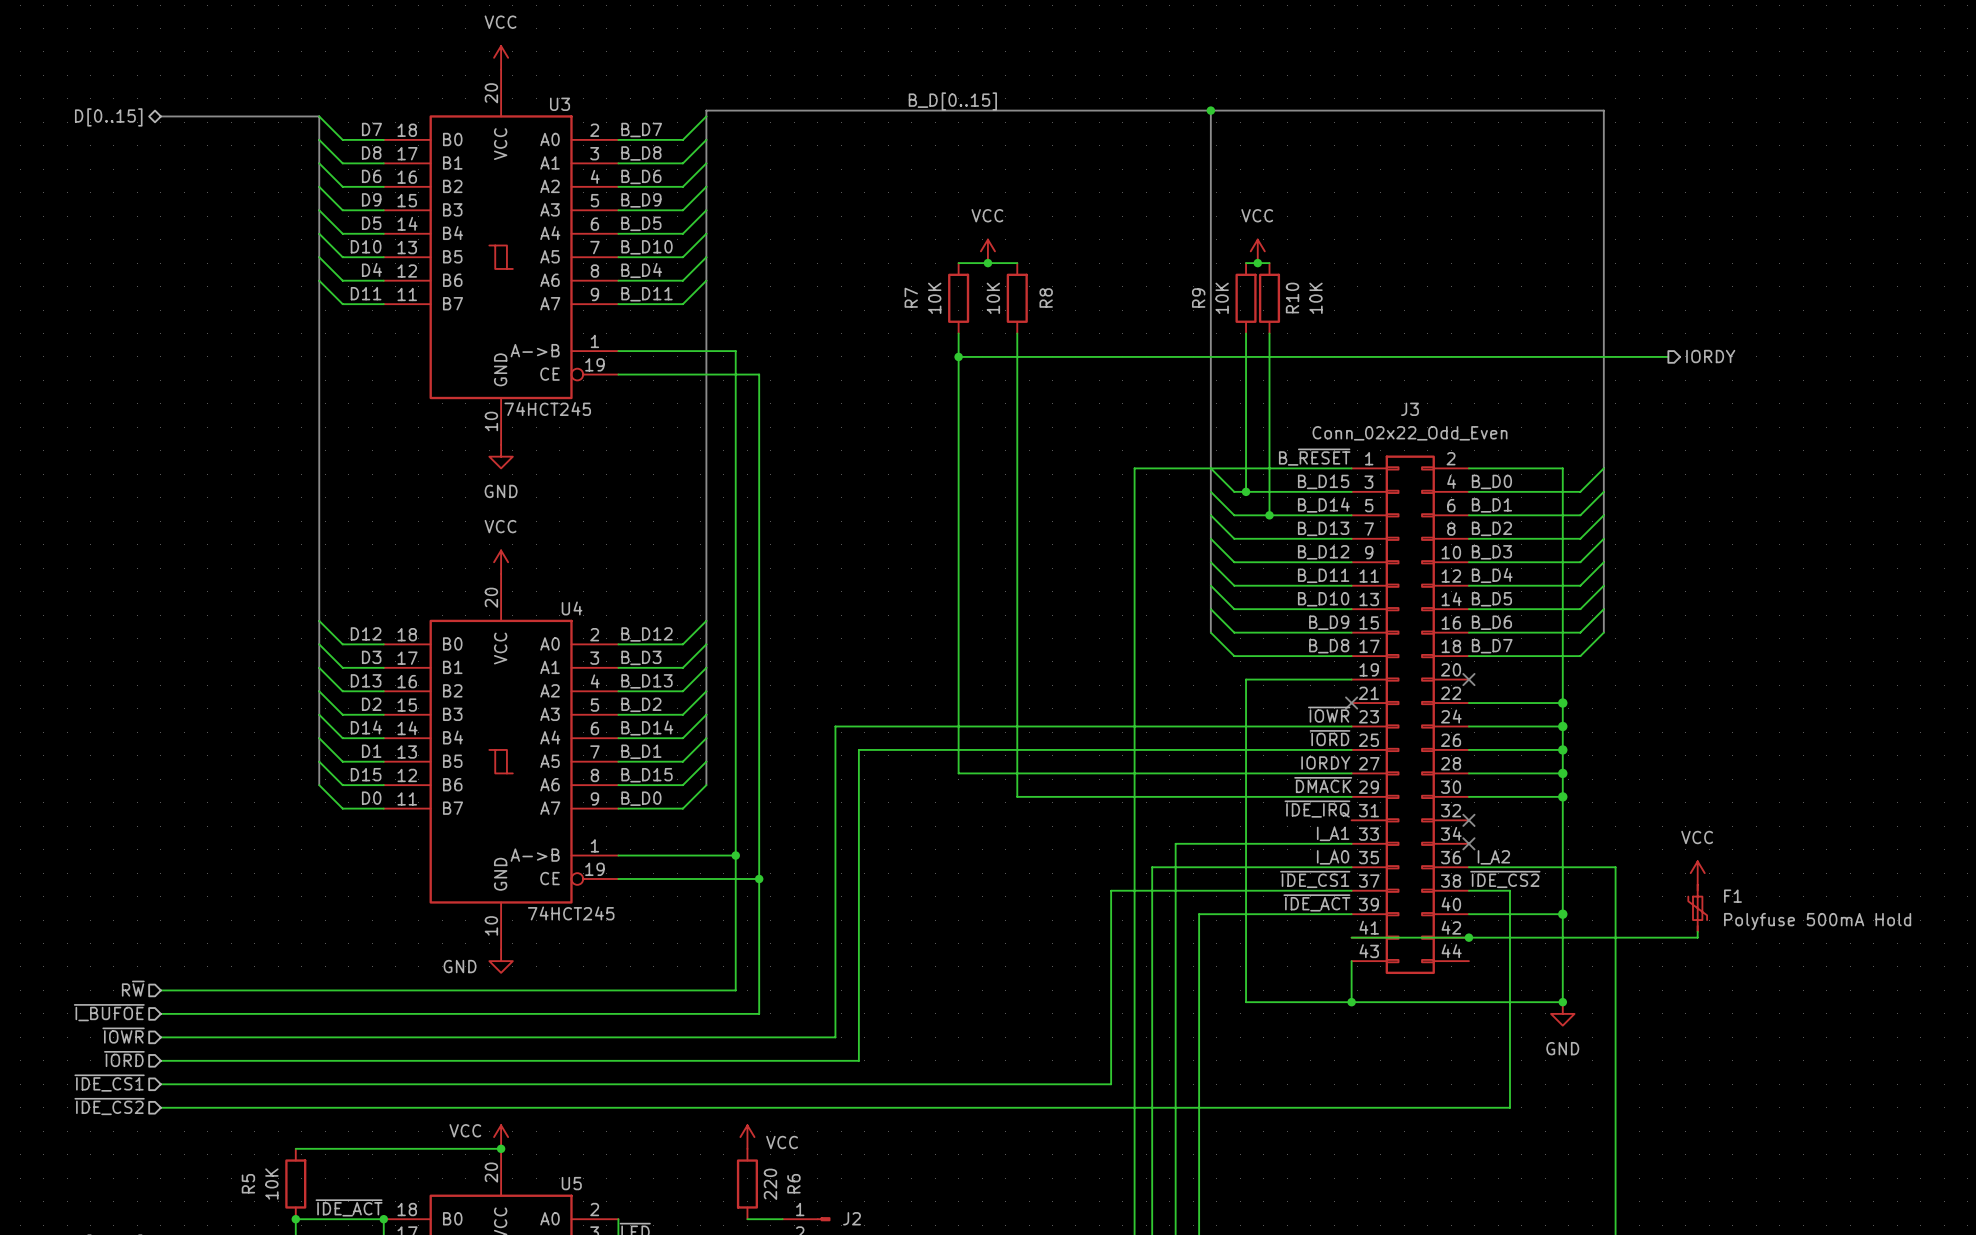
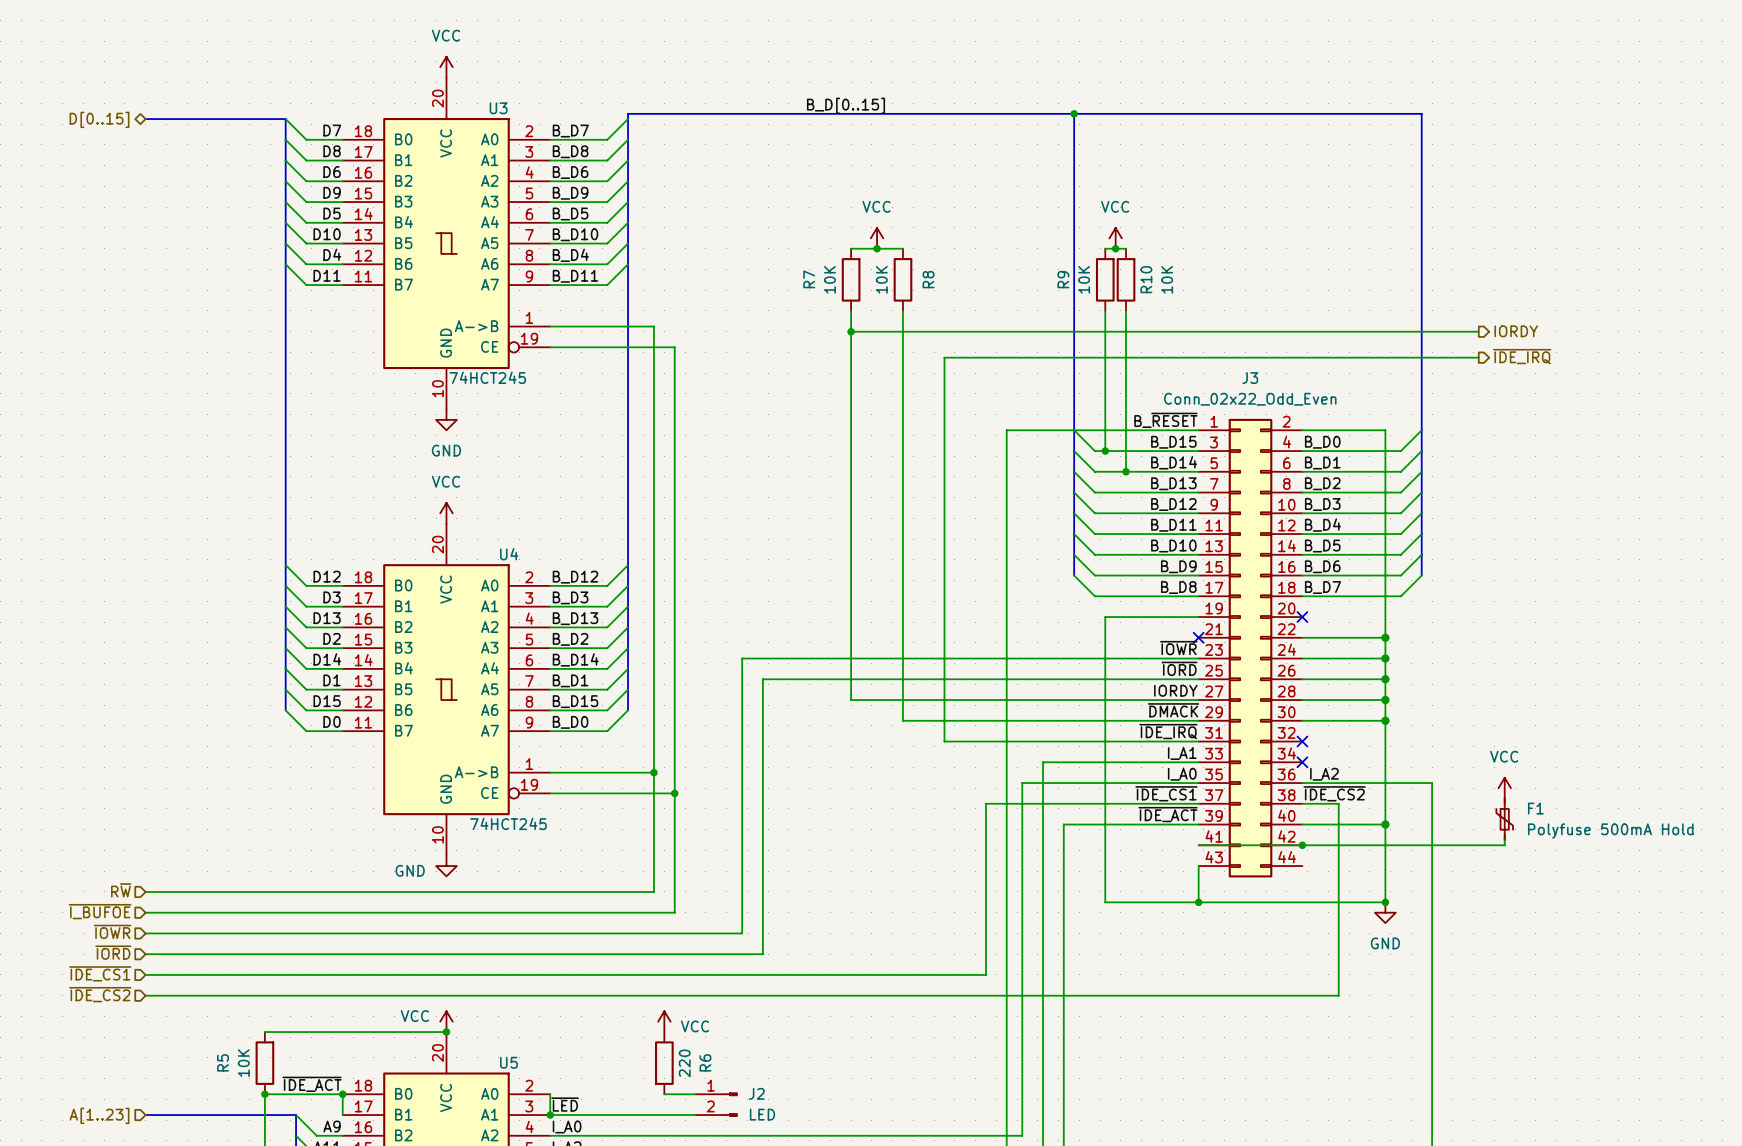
hierarchical label: none -> ~{IDE_IRQ} (1522, 356)
wire: none -> (1478, 357) (944, 357) (944, 741) (1198, 741)

